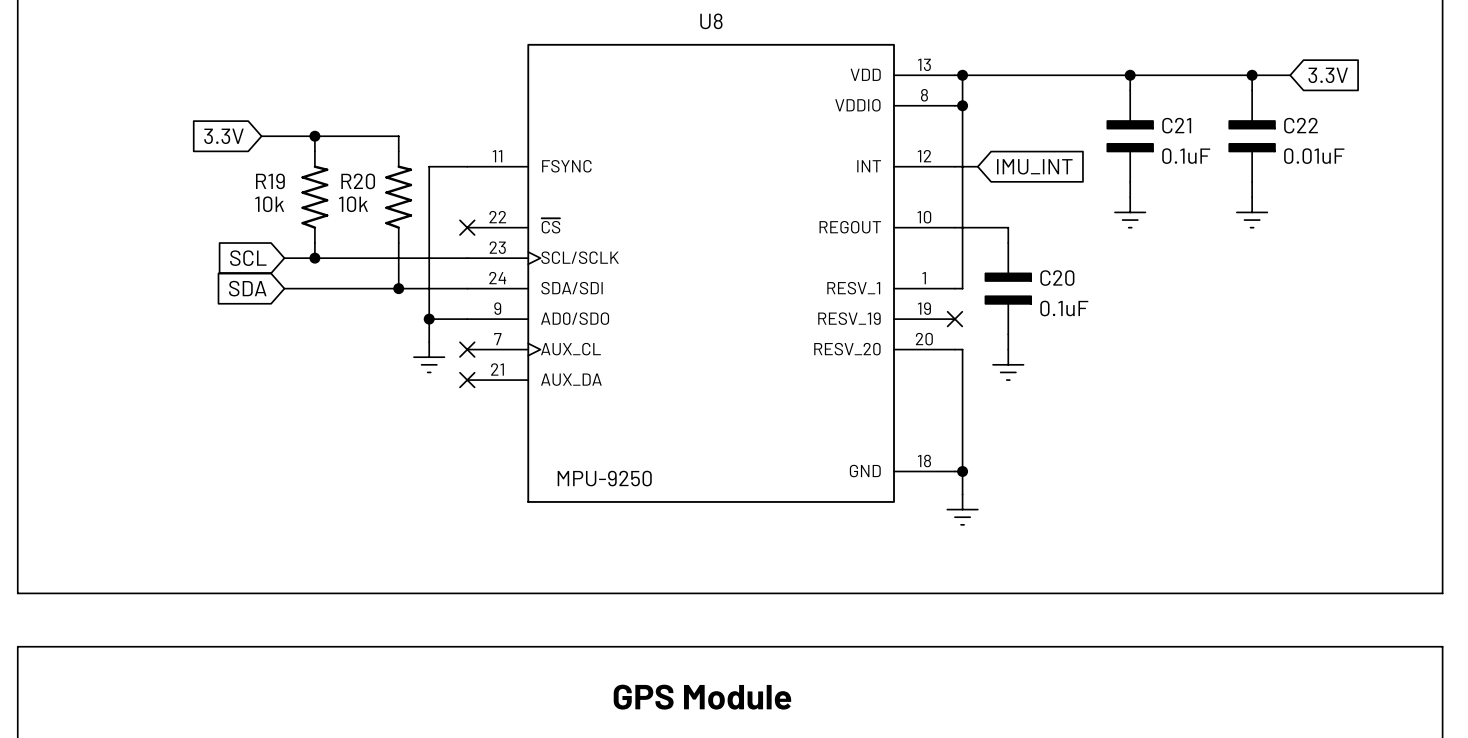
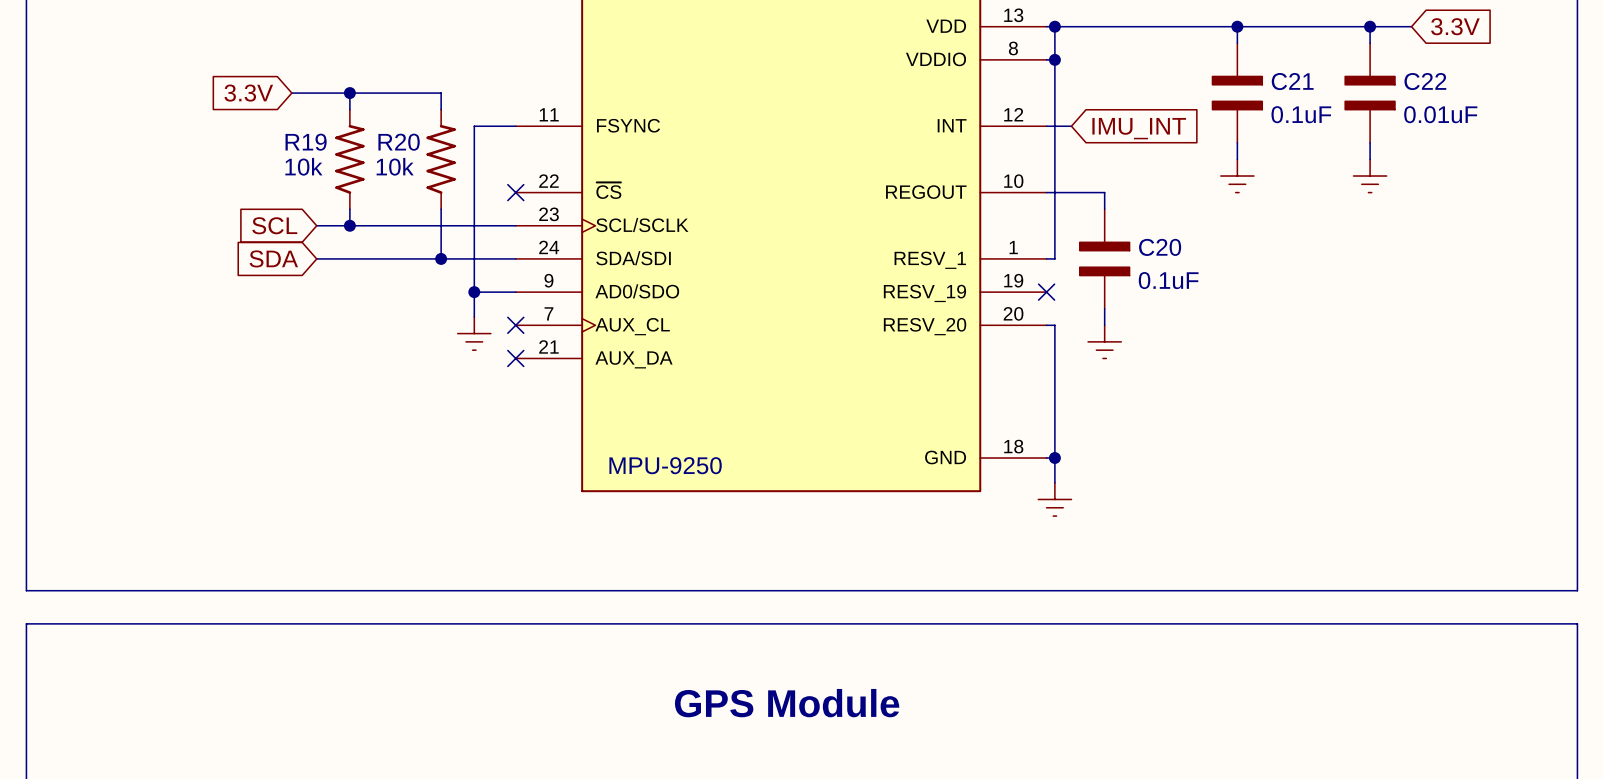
line: (17, 646) (1442, 646) -> (26, 648) (26, 623) (1577, 623) (1577, 648)

